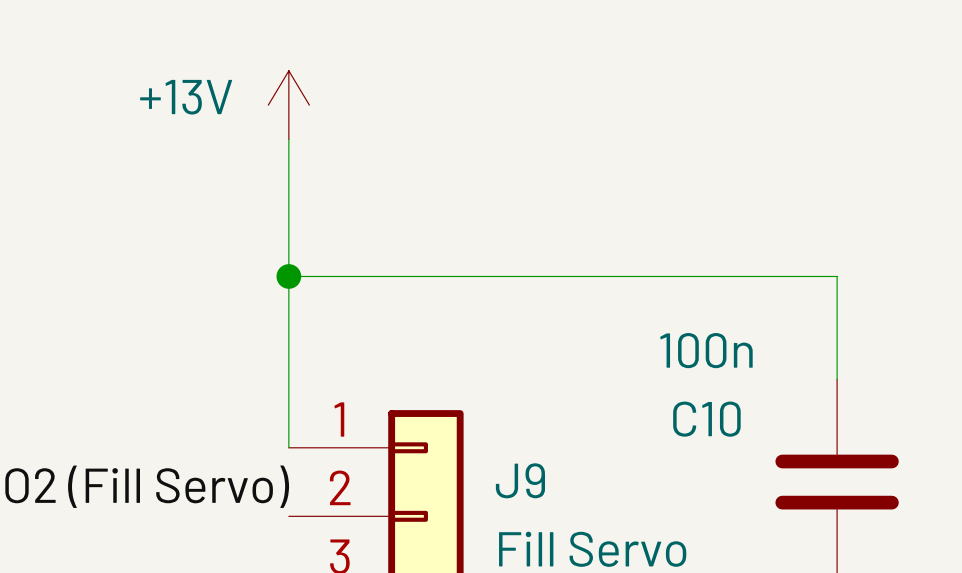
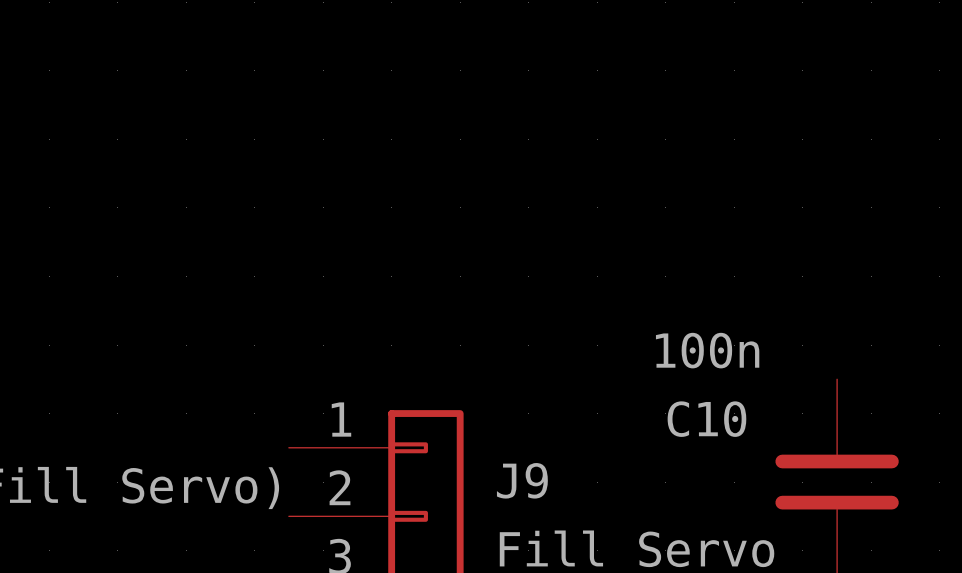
power symbol: +13V (288, 105) -> none
wire: (288, 139) (288, 447) -> none
wire: (288, 276) (837, 276) (837, 379) -> none
junction: (288, 276) -> none

